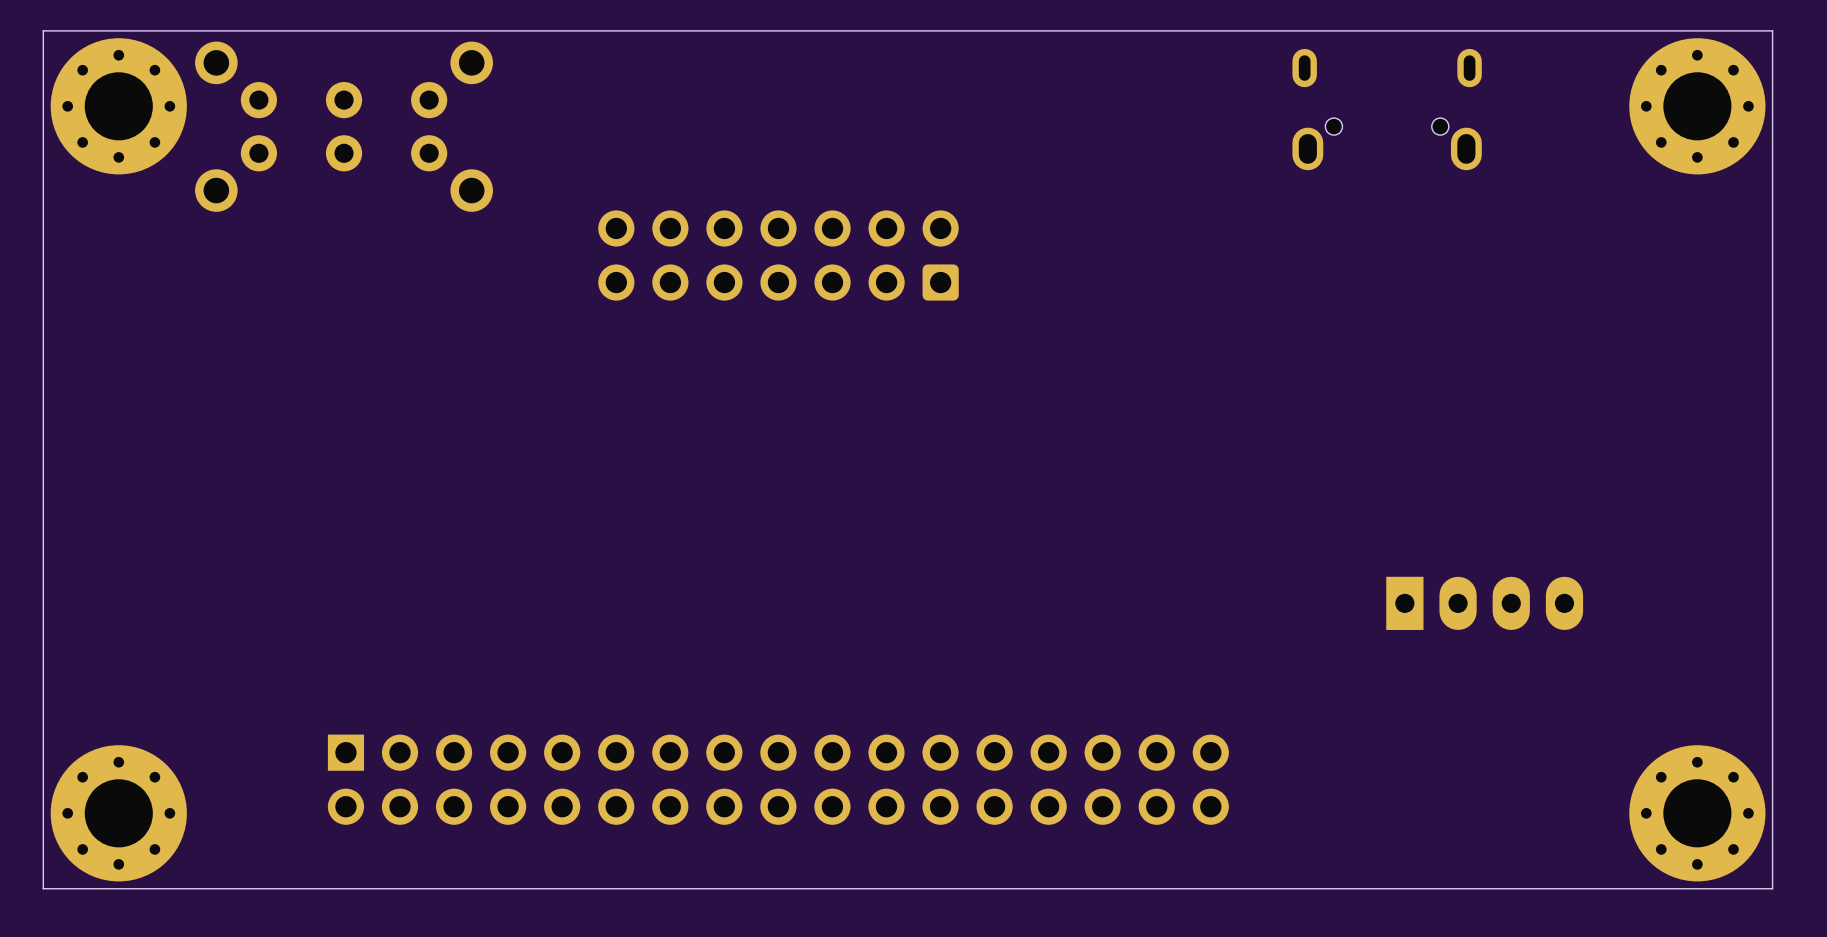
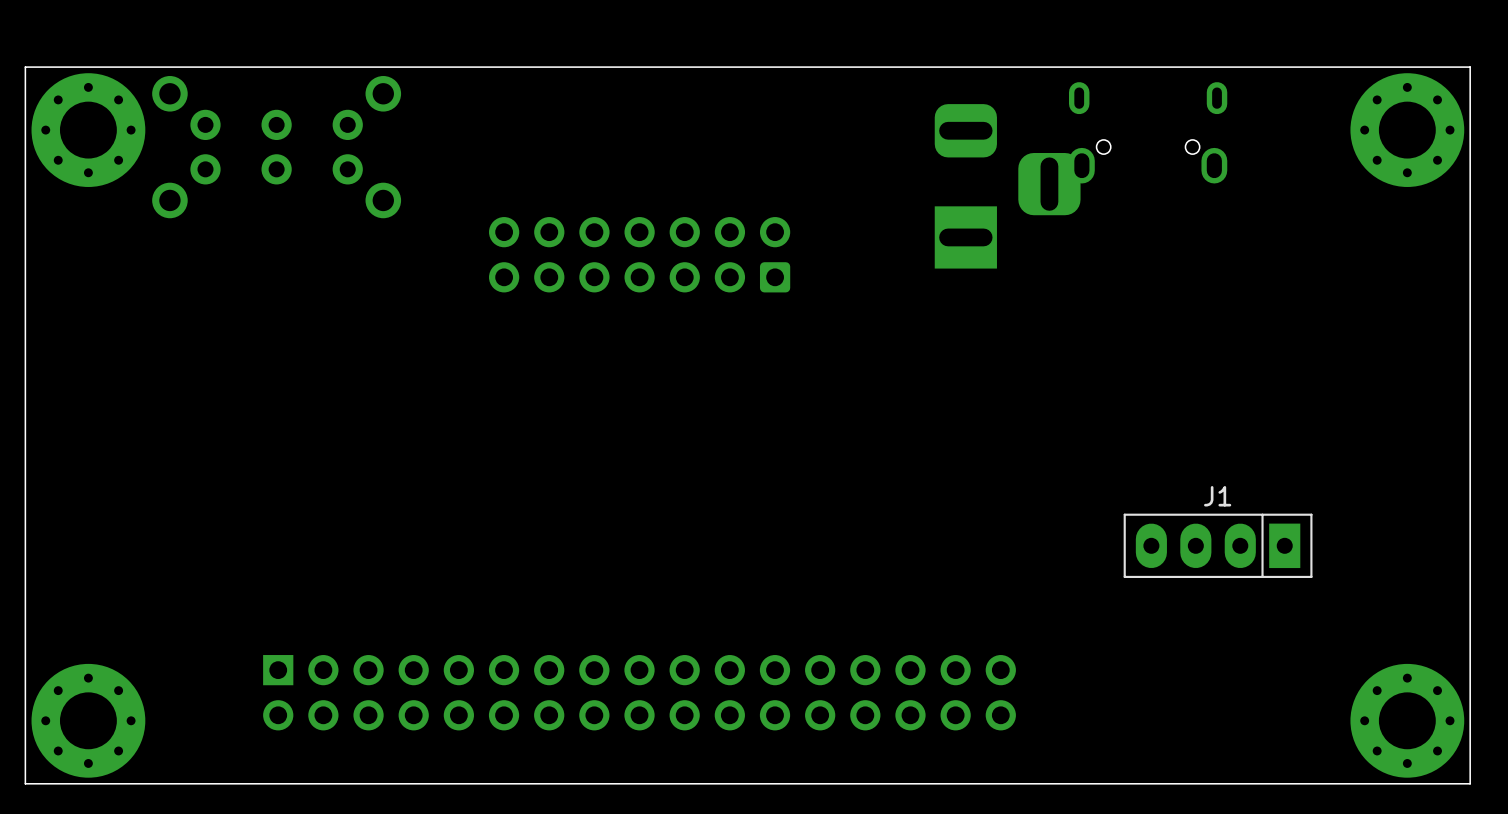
part: none -> (1007, 186)
J1 side: top (1484, 603) -> bottom (1218, 545)

